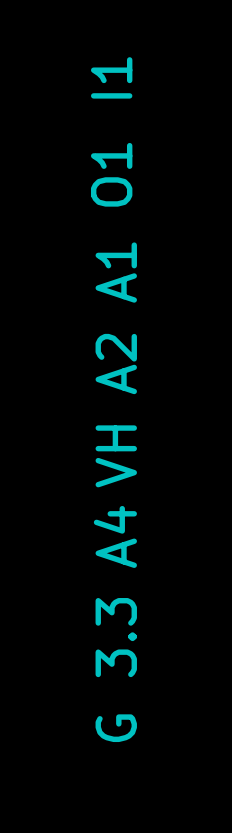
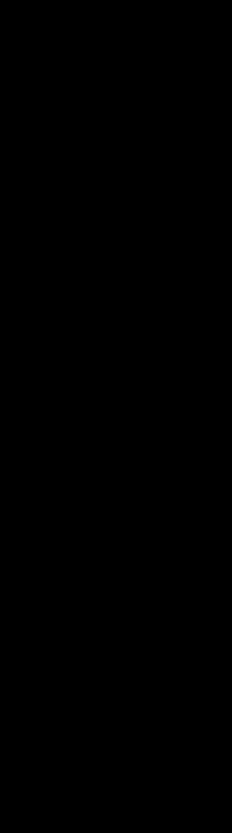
text: I1 (111, 77) -> none
text: O1 (111, 174) -> none
text: A1 (116, 272) -> none
text: A2 (116, 364) -> none
text: VH (116, 456) -> none
text: A4 (115, 536) -> none
text: 3.3 (116, 637) -> none
text: G (116, 728) -> none

